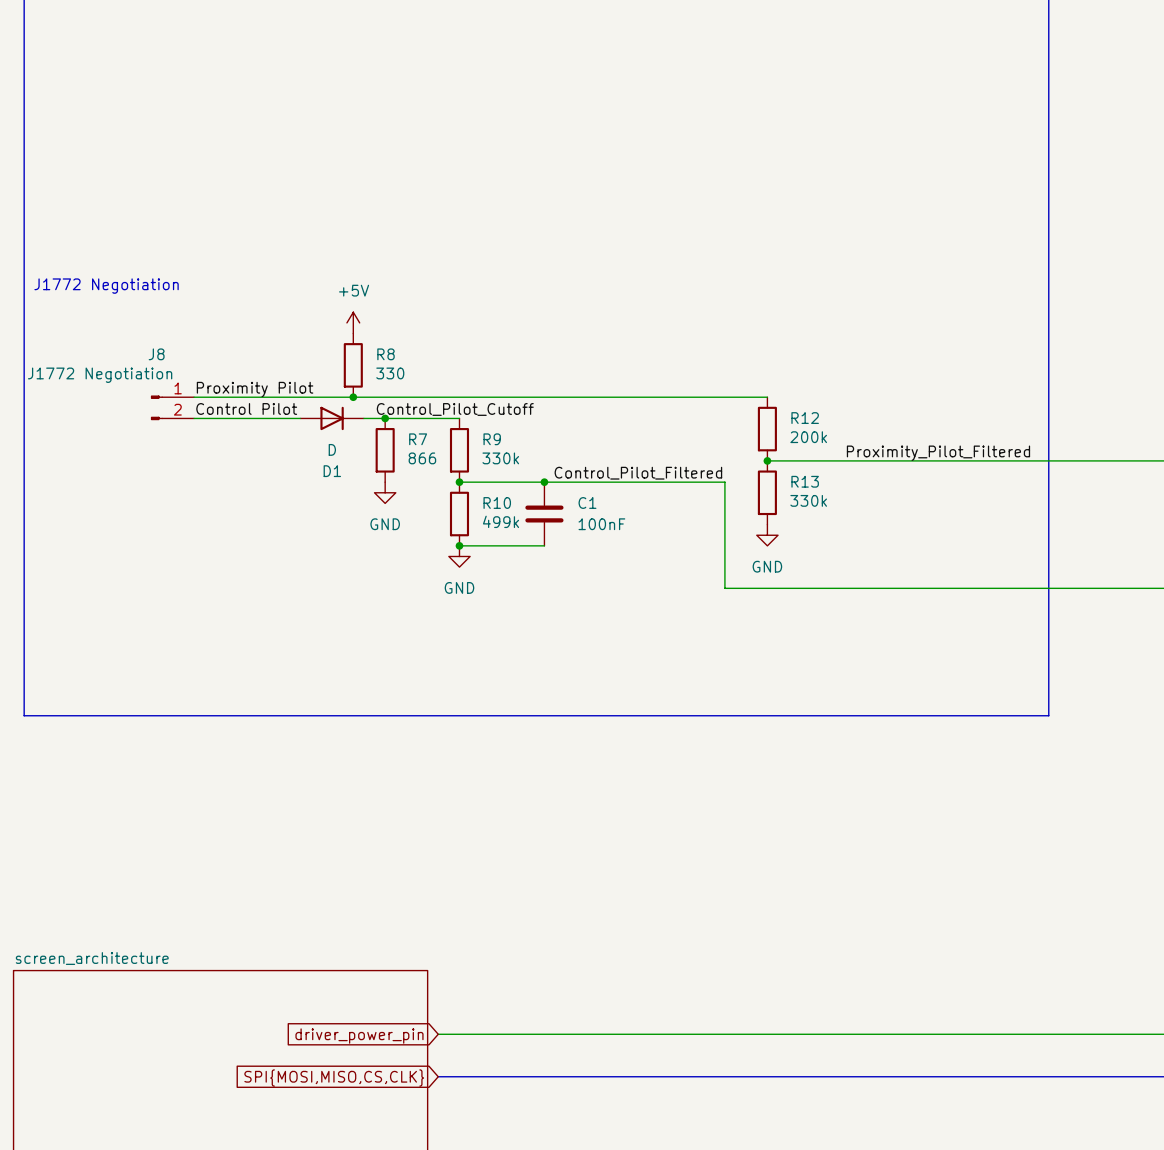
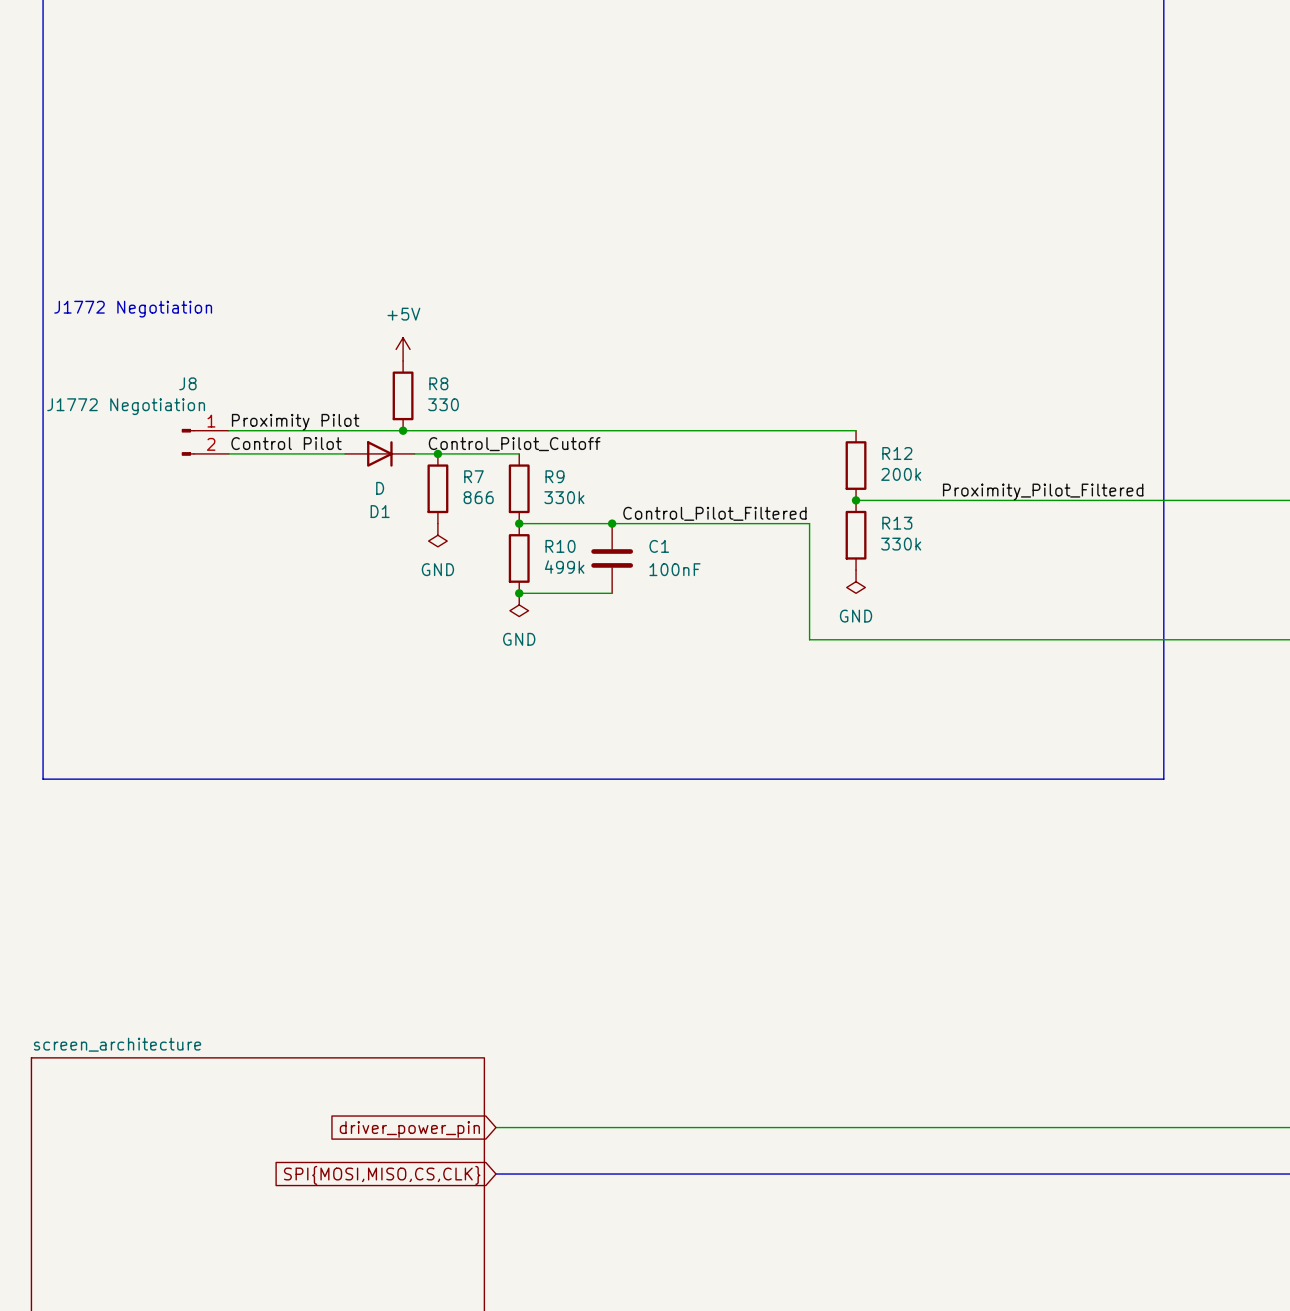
power symbol shape: [374, 482, 396, 504] -> [428, 523, 448, 547]
power symbol shape: [756, 524, 779, 546] -> [846, 570, 866, 594]
power symbol shape: [448, 545, 471, 568] -> [509, 593, 529, 617]

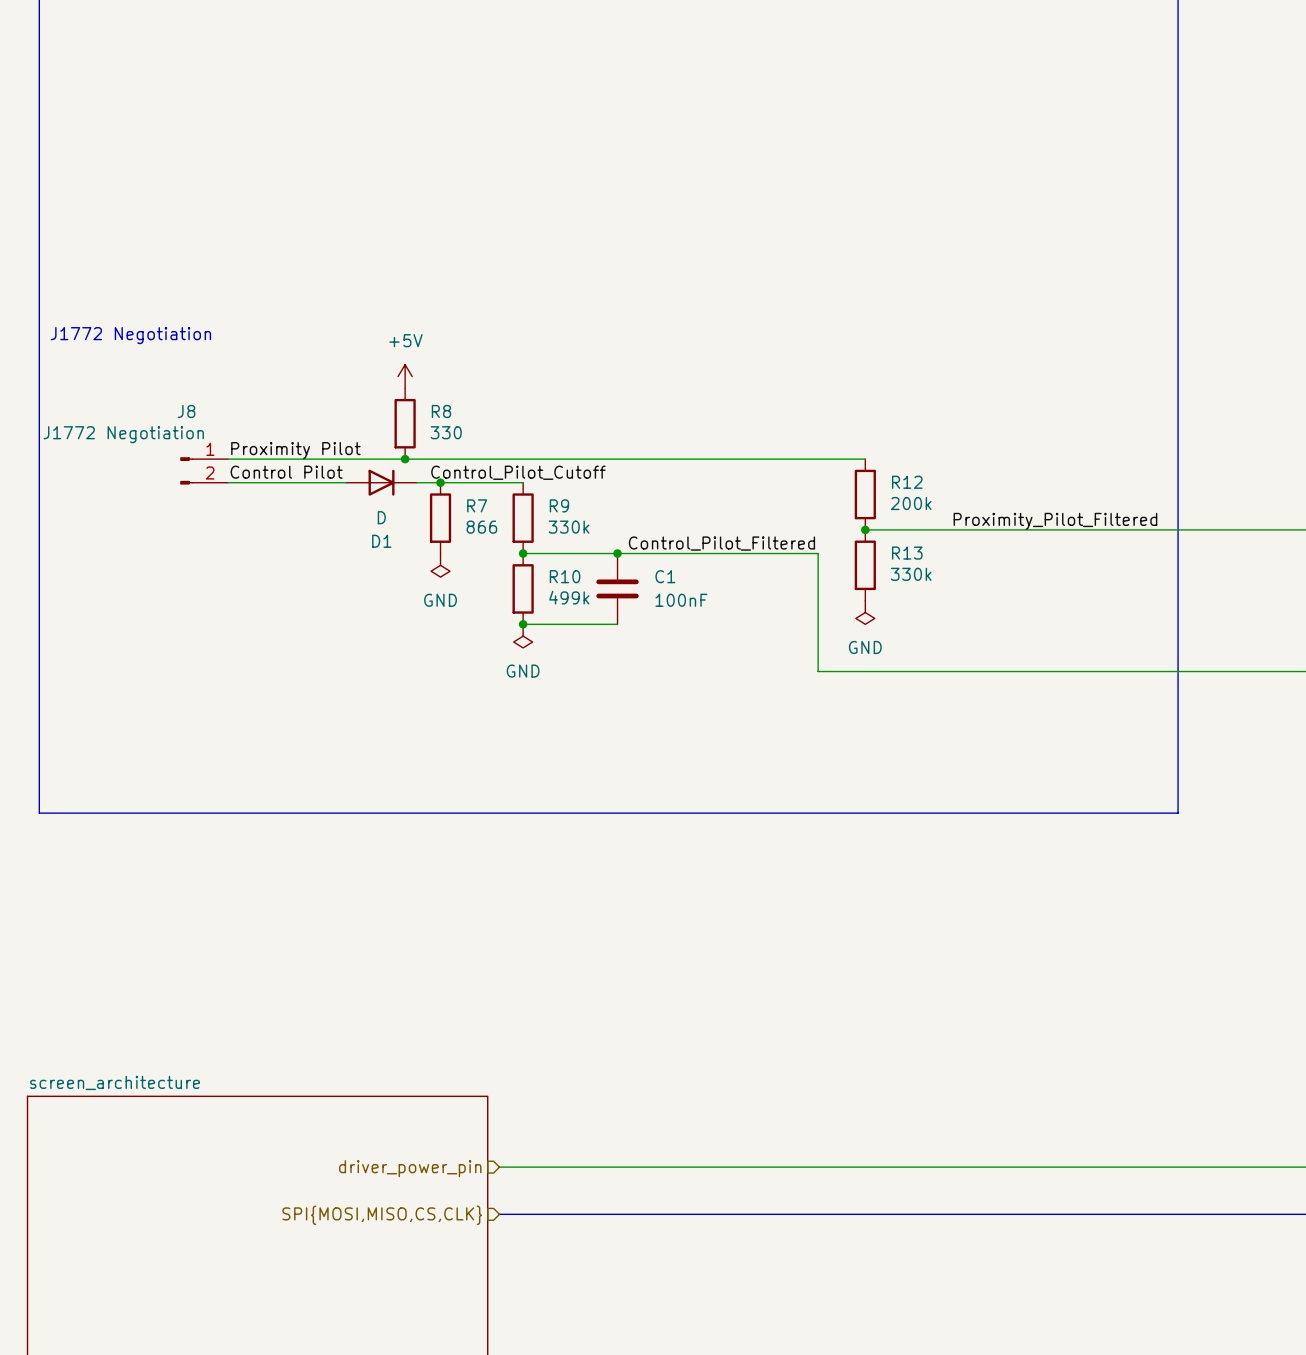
hierarchical label: none -> driver_power_pin (410, 1168)
global label: driver_power_pin (409, 1129) -> none
hierarchical label: none -> SPI{MOSI,MISO,CS,CLK} (382, 1215)
global label: SPI{MOSI,MISO,CS,CLK} (382, 1175) -> none

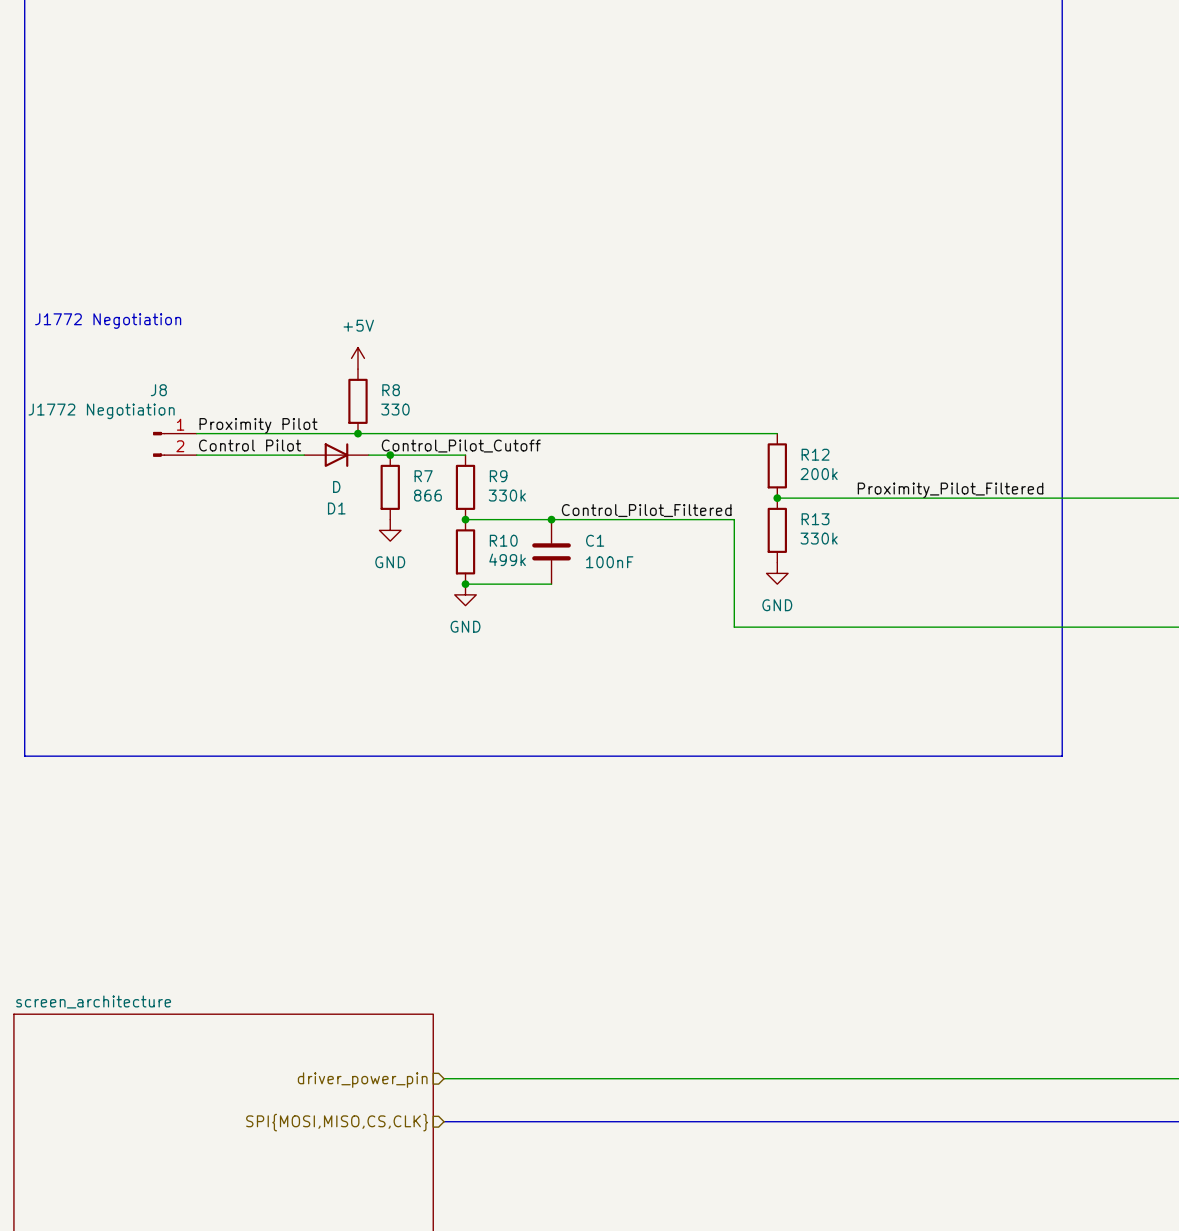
power symbol shape: [431, 553, 450, 578] -> [379, 519, 402, 542]
power symbol shape: [855, 600, 875, 625] -> [766, 562, 789, 585]
power symbol shape: [513, 624, 533, 648] -> [454, 584, 477, 606]

